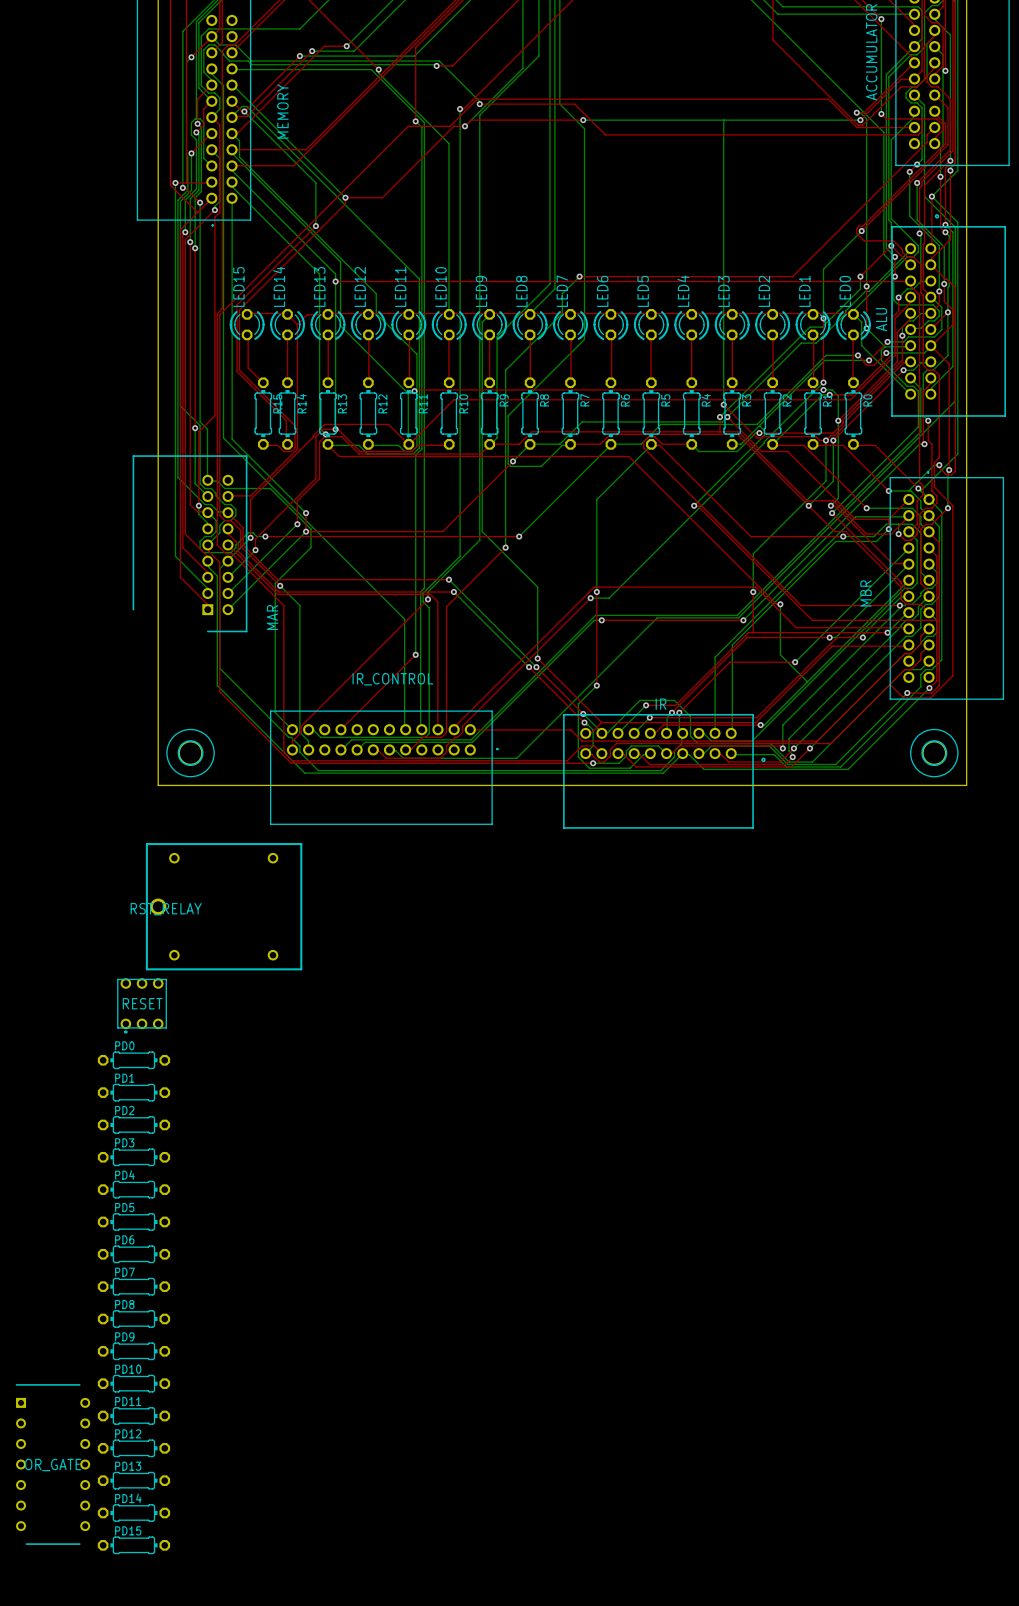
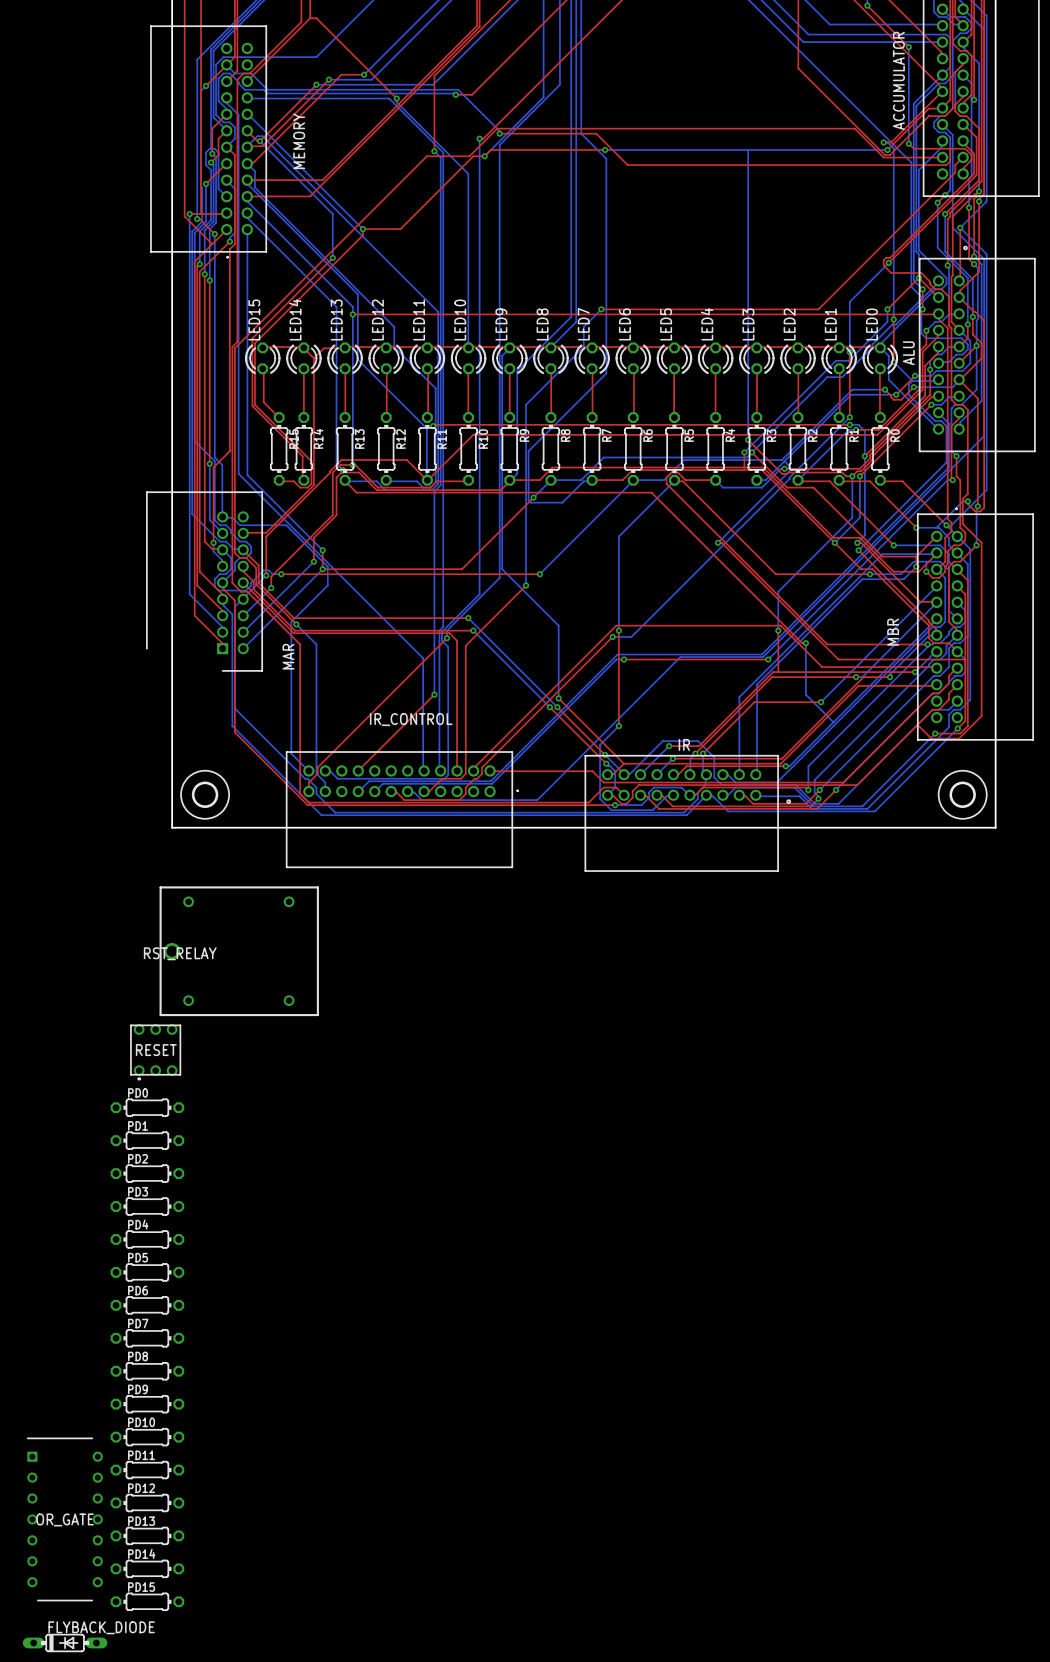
FLYBACK_DIODE: none -> (65, 1642)

